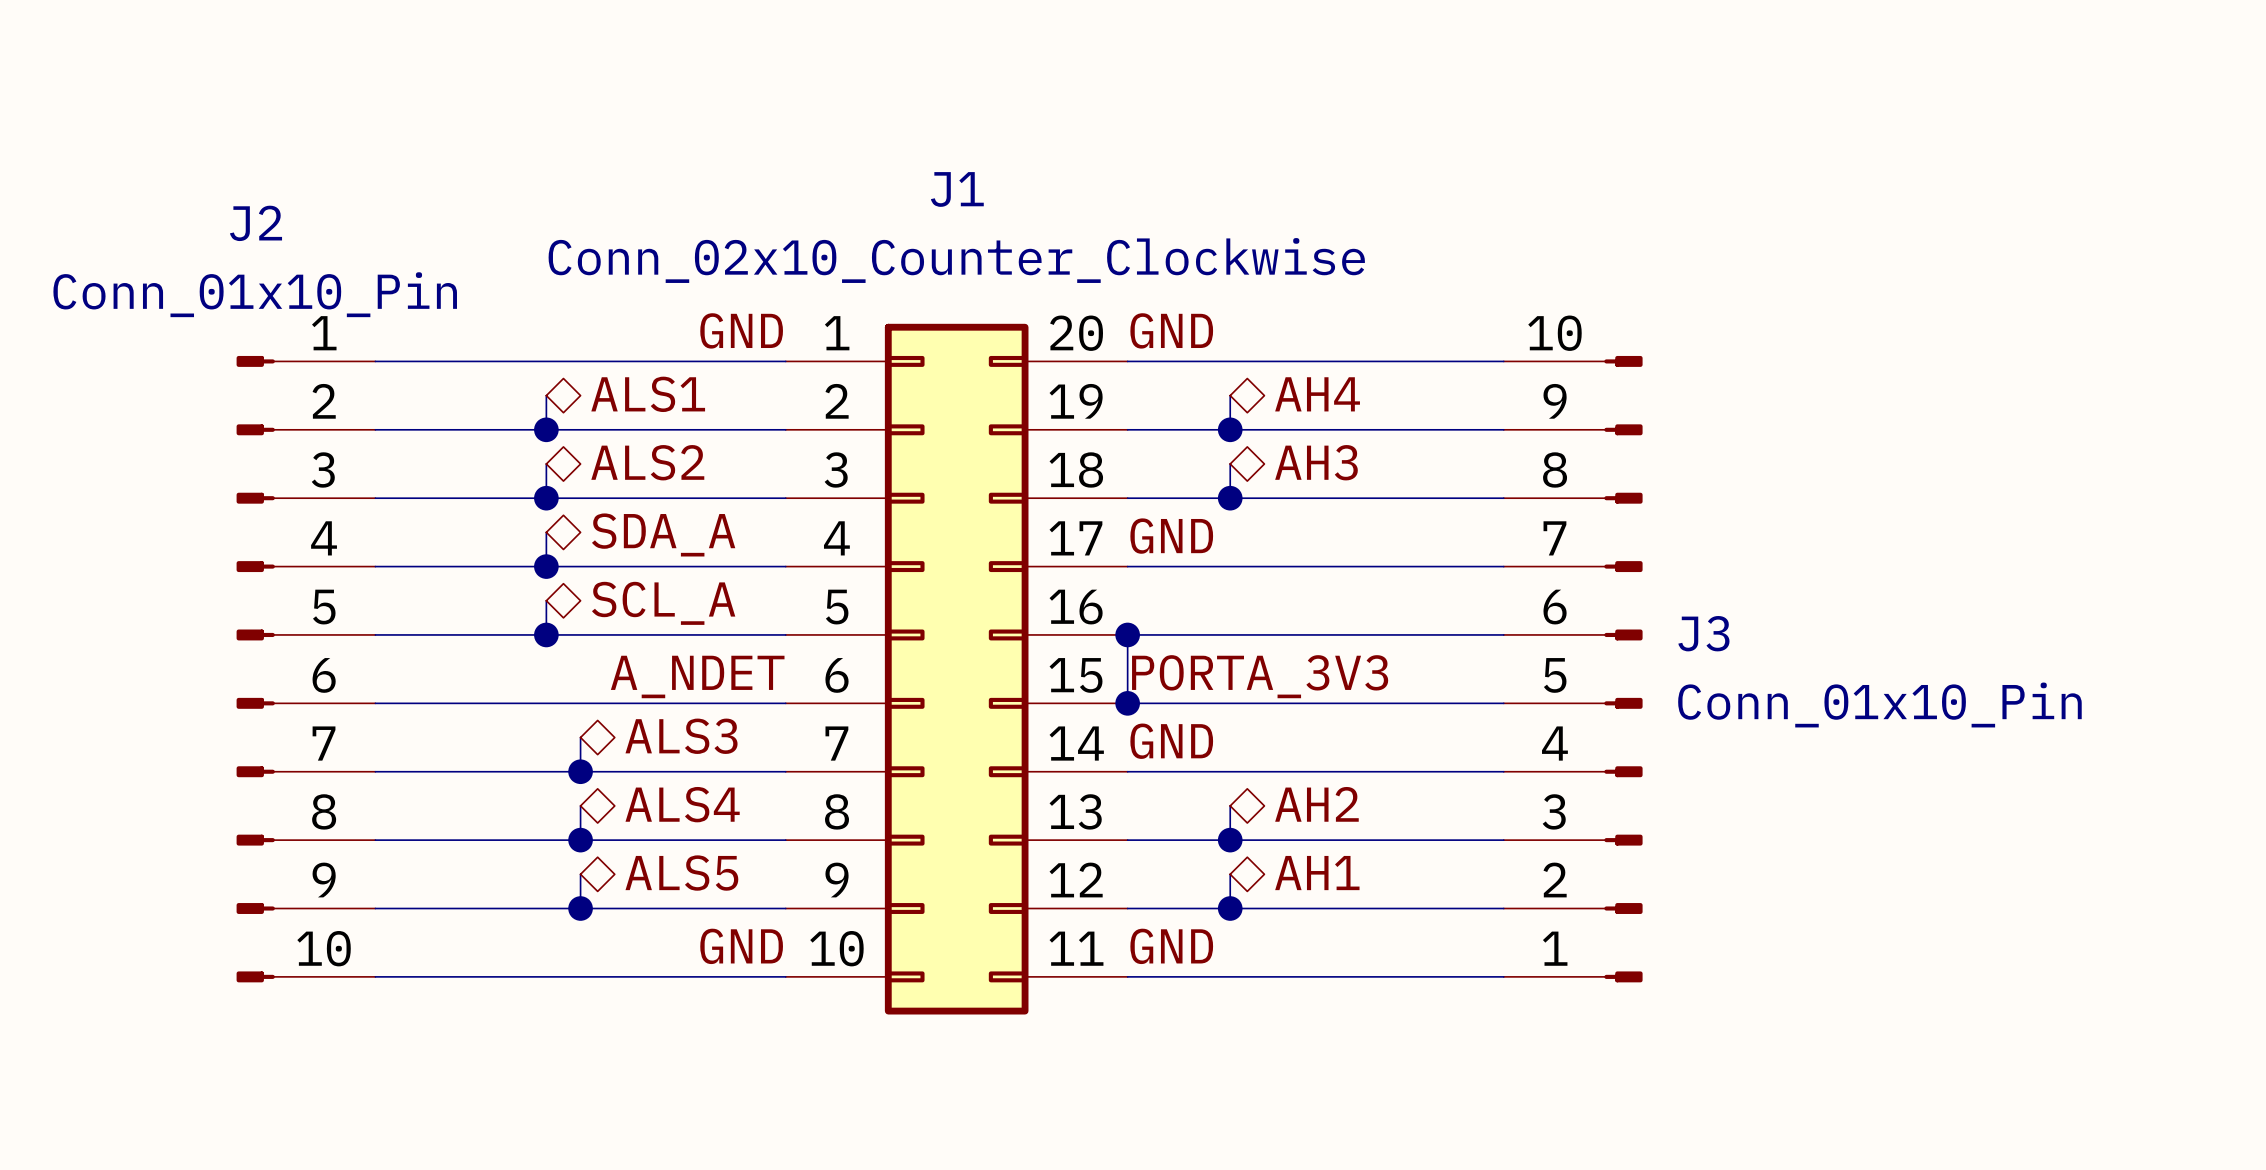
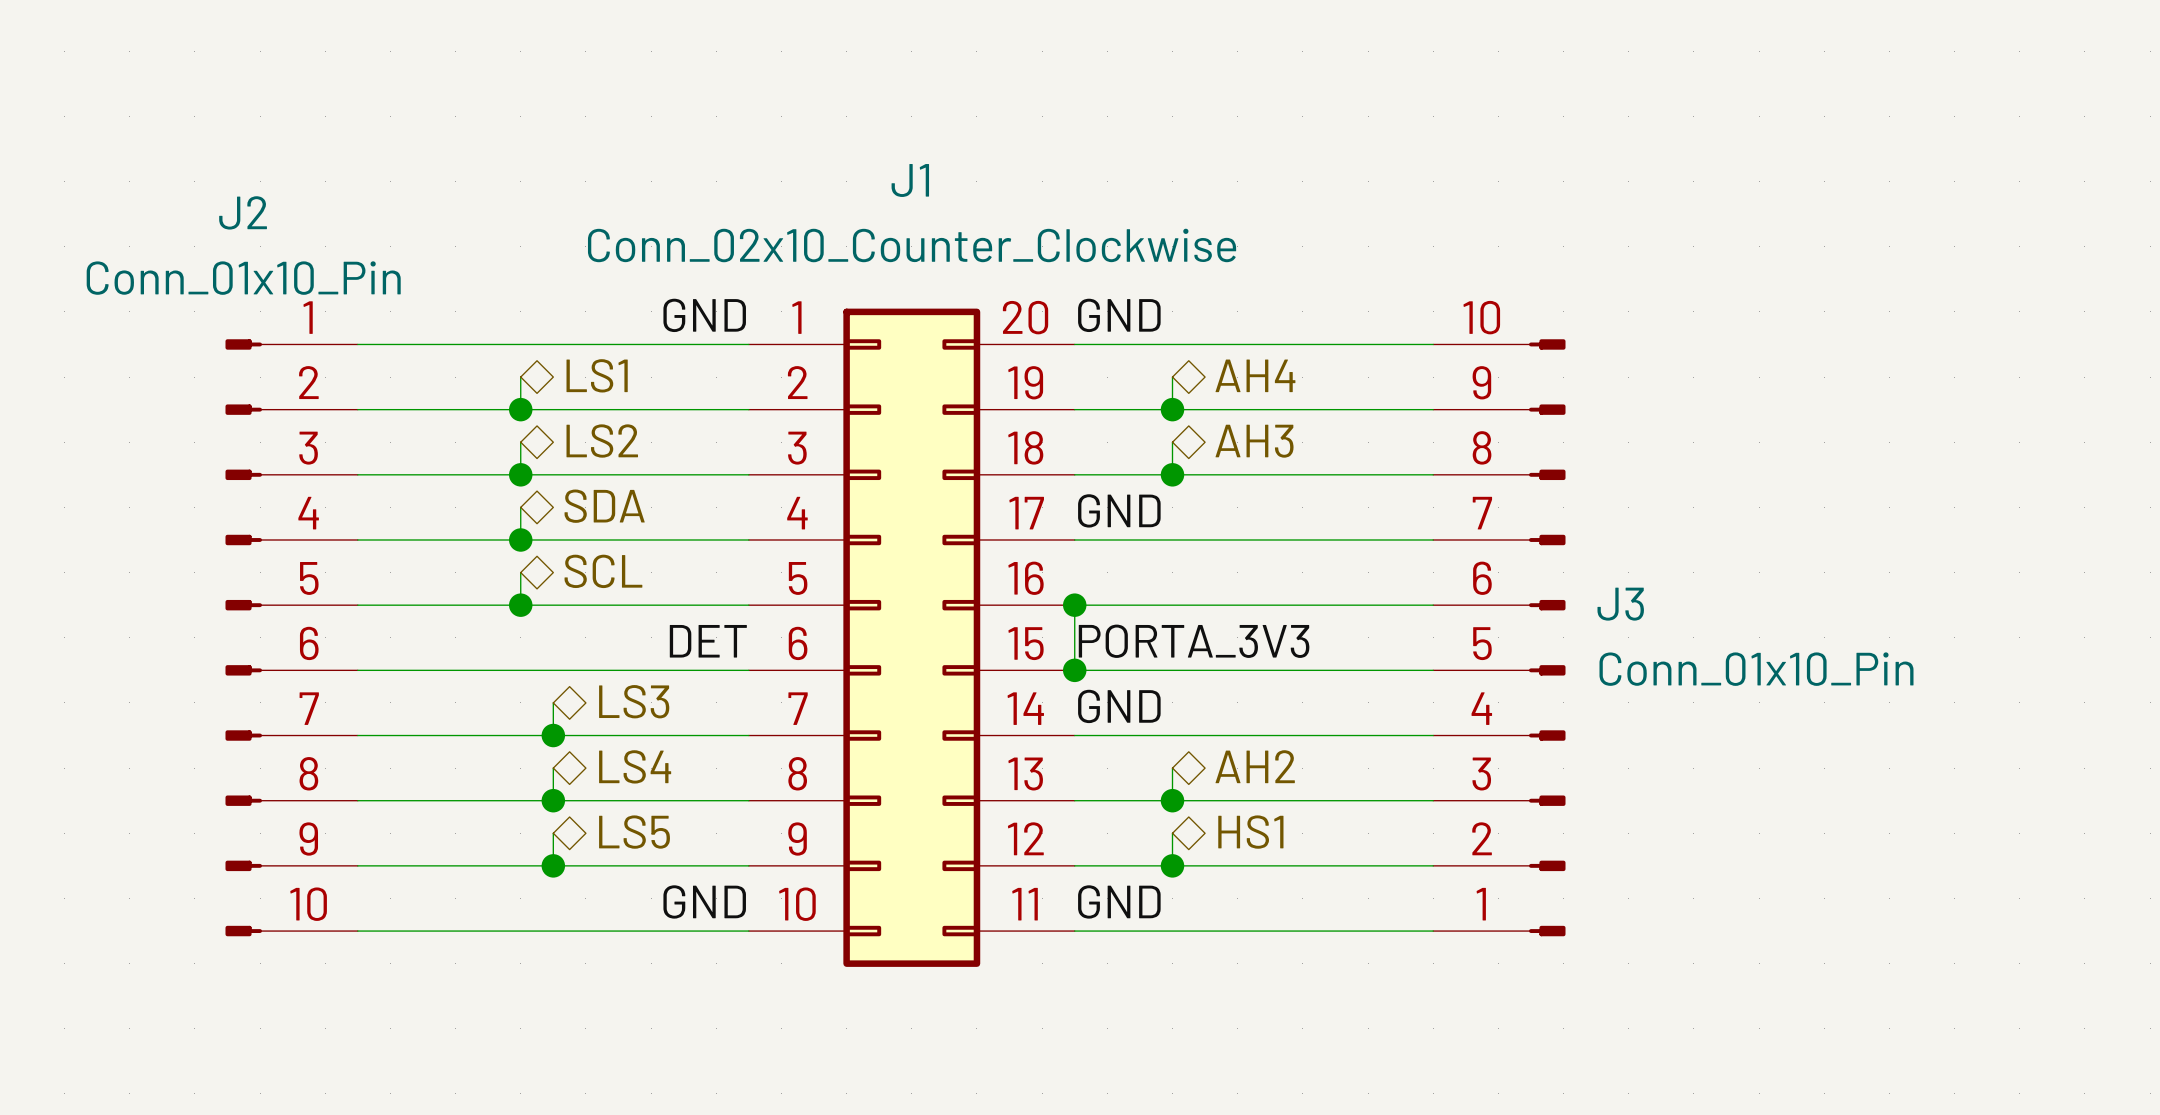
hierarchical label: ALS1 (648, 394) -> LS1 (597, 375)
hierarchical label: ALS2 (647, 462) -> LS2 (602, 441)
hierarchical label: SDA_A (663, 534) -> SDA (604, 506)
hierarchical label: SCL_A (663, 603) -> SCL (603, 571)
label: A_NDET (697, 676) -> DET (708, 641)
hierarchical label: ALS3 (681, 736) -> LS3 (634, 701)
hierarchical label: ALS4 (682, 804) -> LS4 (635, 766)
hierarchical label: ALS5 (681, 873) -> LS5 (634, 832)
hierarchical label: AH1 (1317, 873) -> HS1 (1250, 832)

